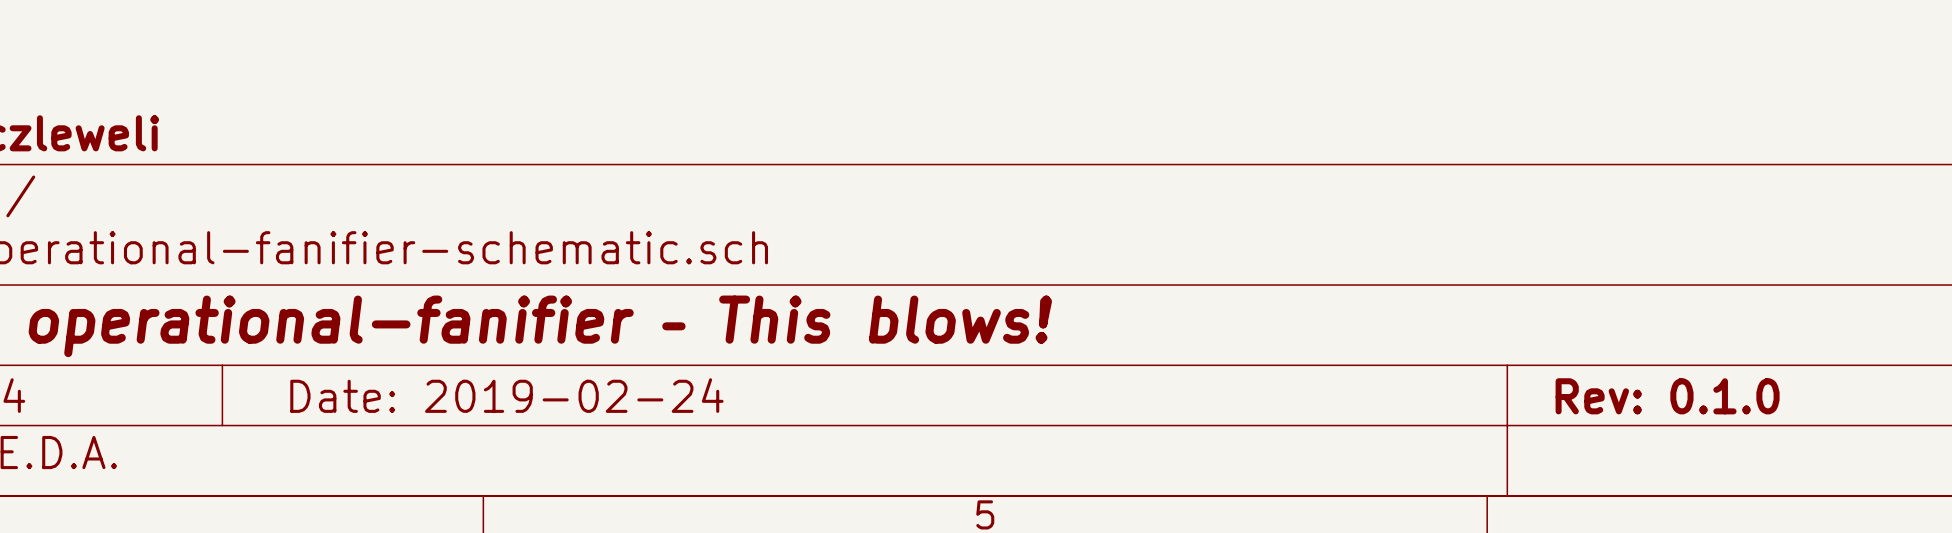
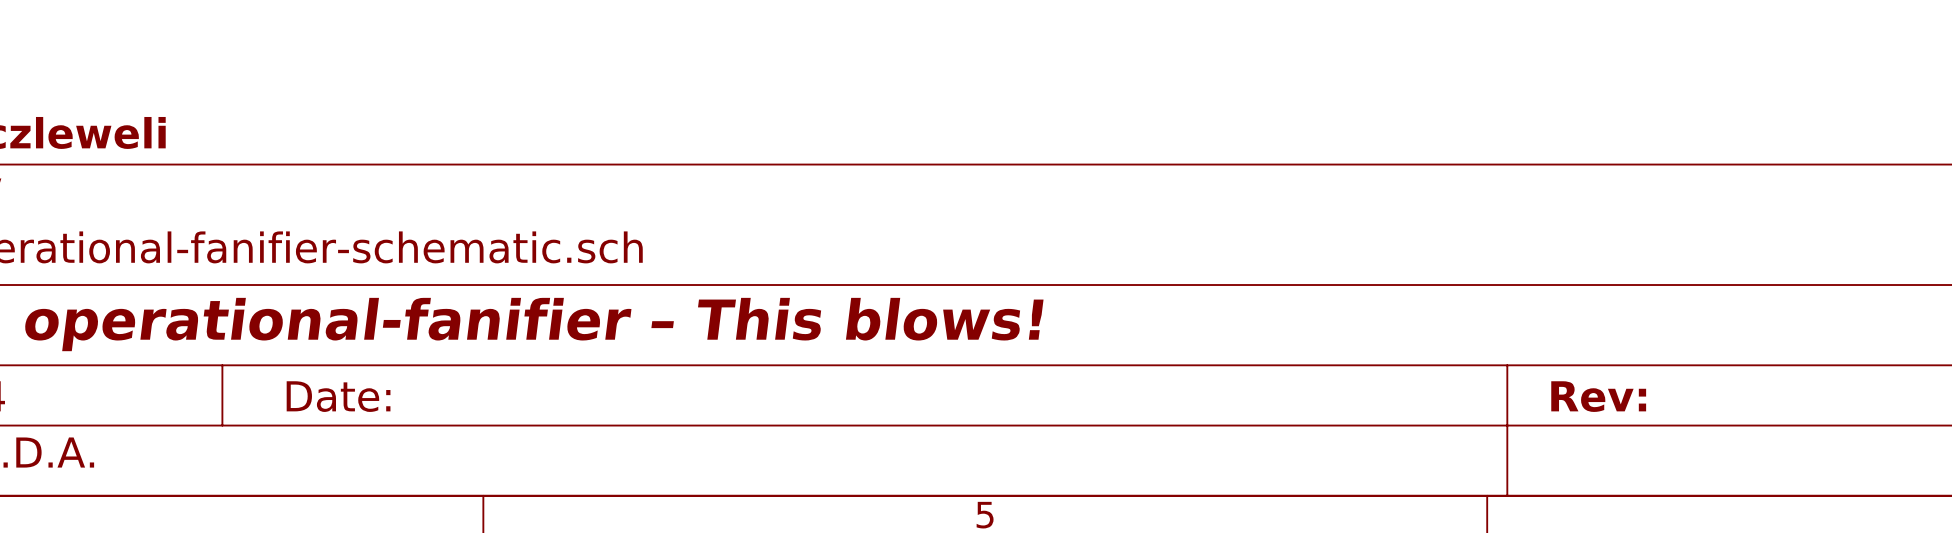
title block: Date: 2019-02-24 (506, 395) -> Date: (338, 396)
title block: Rev: 0.1.0 (1667, 396) -> Rev: (1598, 396)

